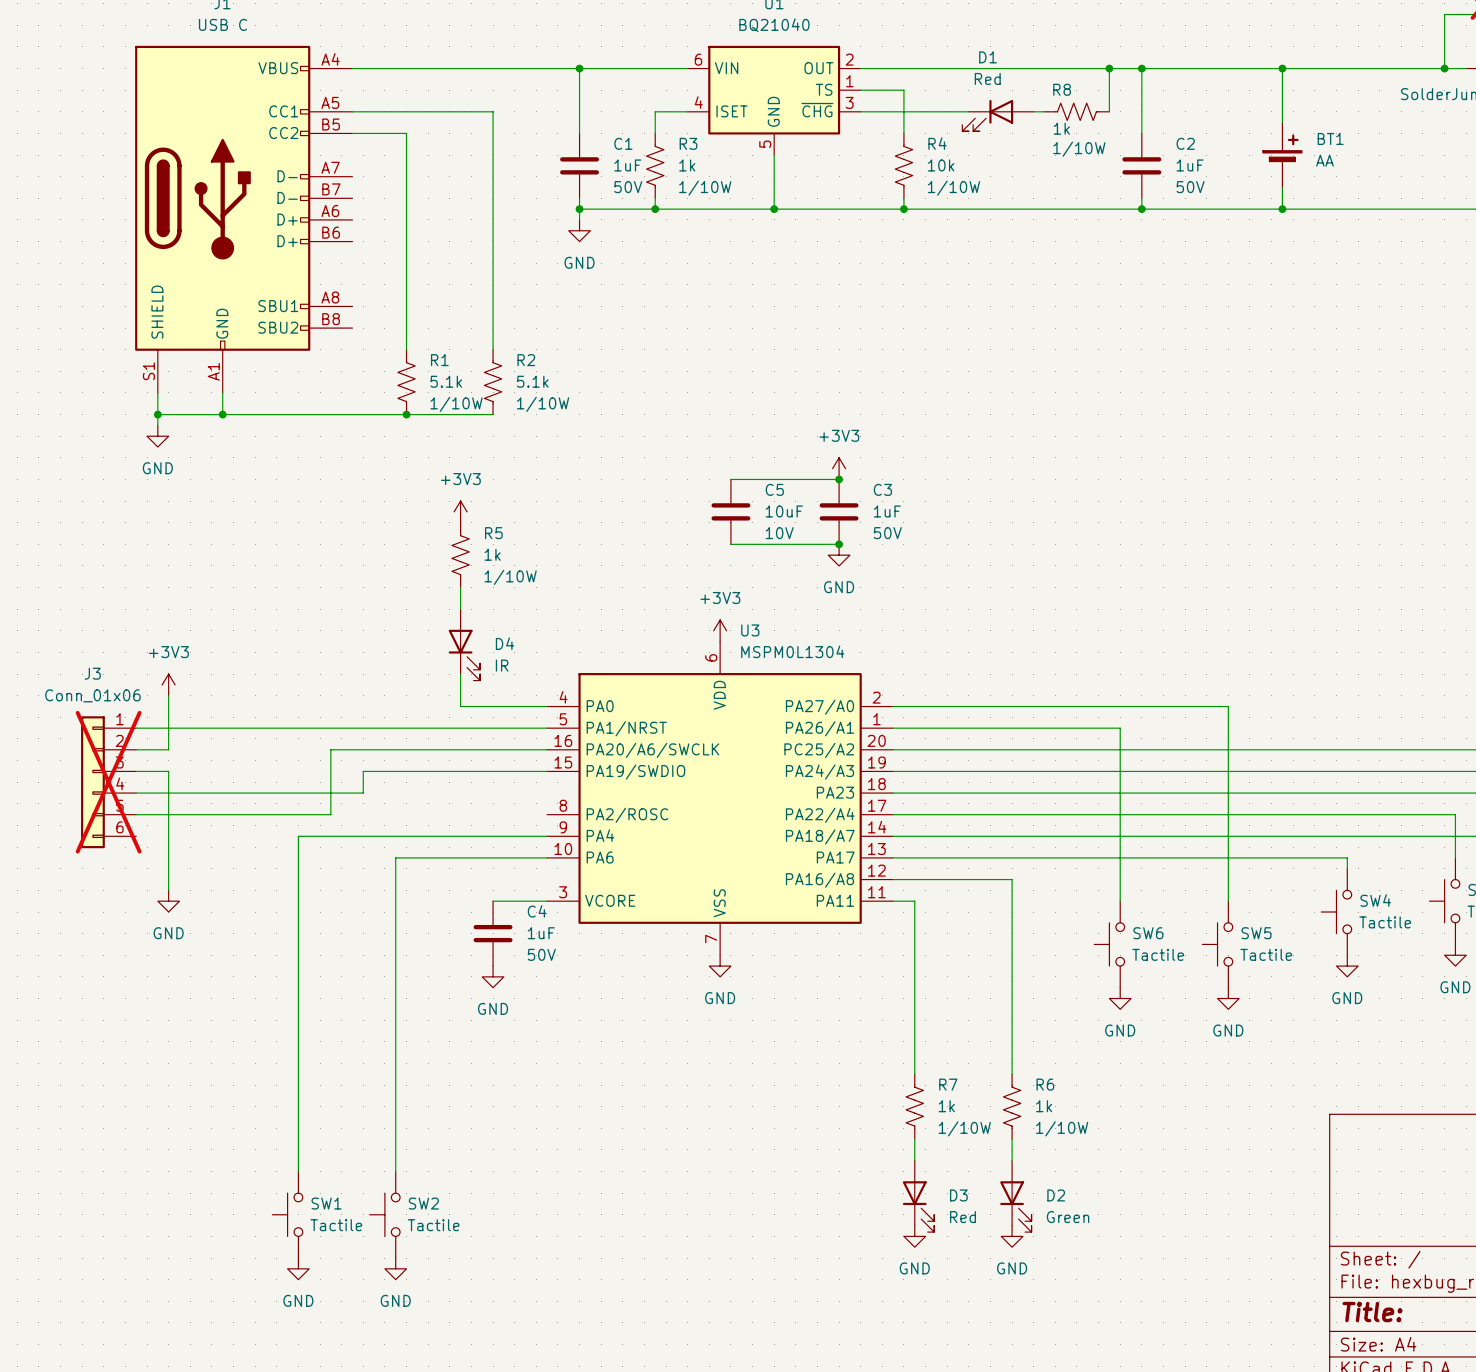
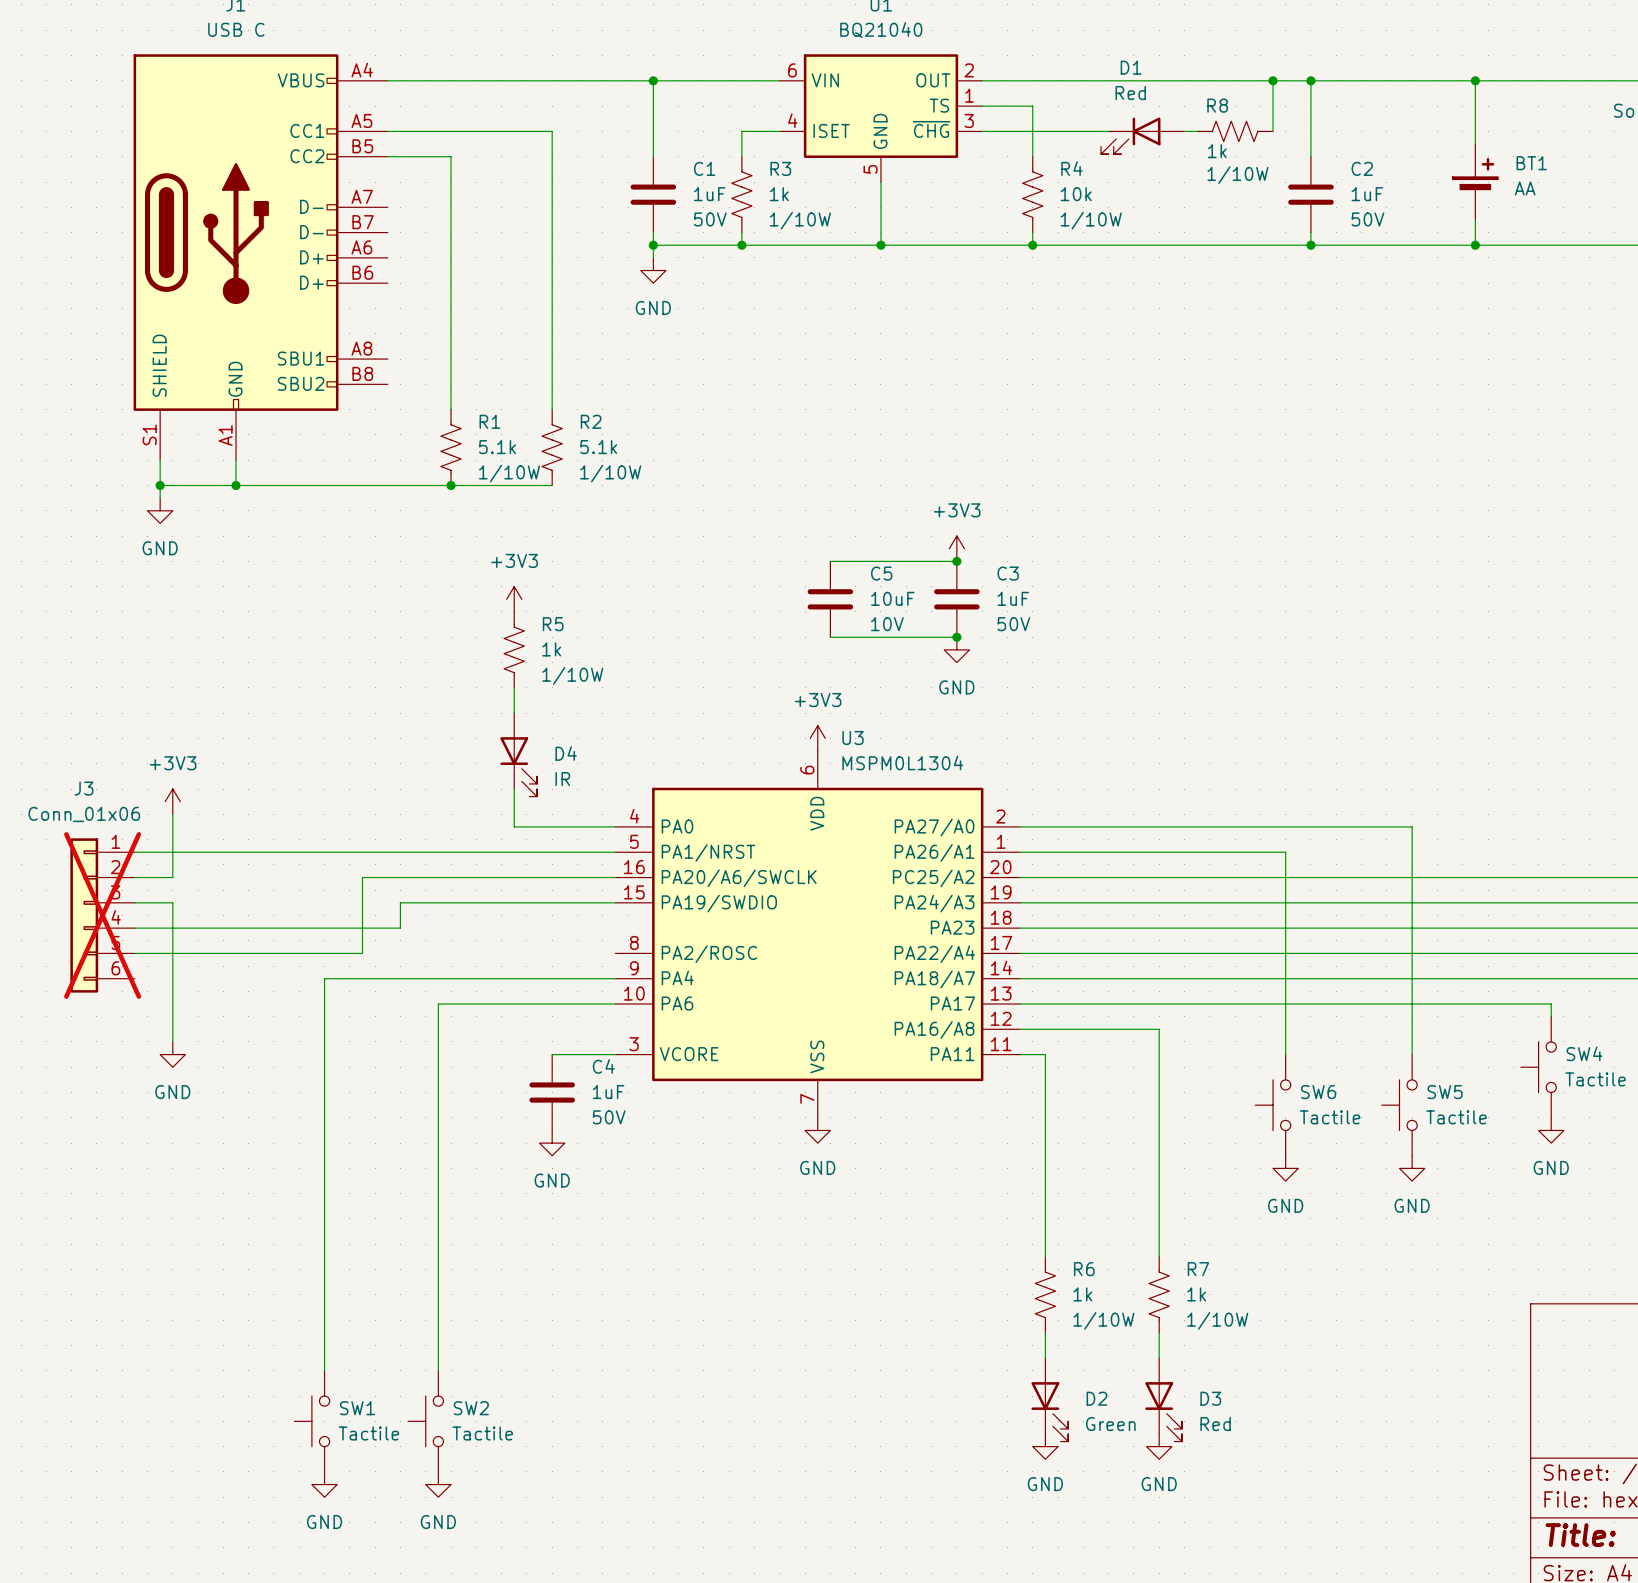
R7 name: R7 (948, 1084) -> R6 (1084, 1269)
R6 name: R6 (1045, 1084) -> R7 (1198, 1269)
D3 name: D3 (958, 1195) -> D2 (1096, 1398)
D2 name: D2 (1056, 1195) -> D3 (1210, 1398)
D3 value: Red (962, 1217) -> Green (1110, 1424)
D2 value: Green (1068, 1217) -> Red (1215, 1424)

